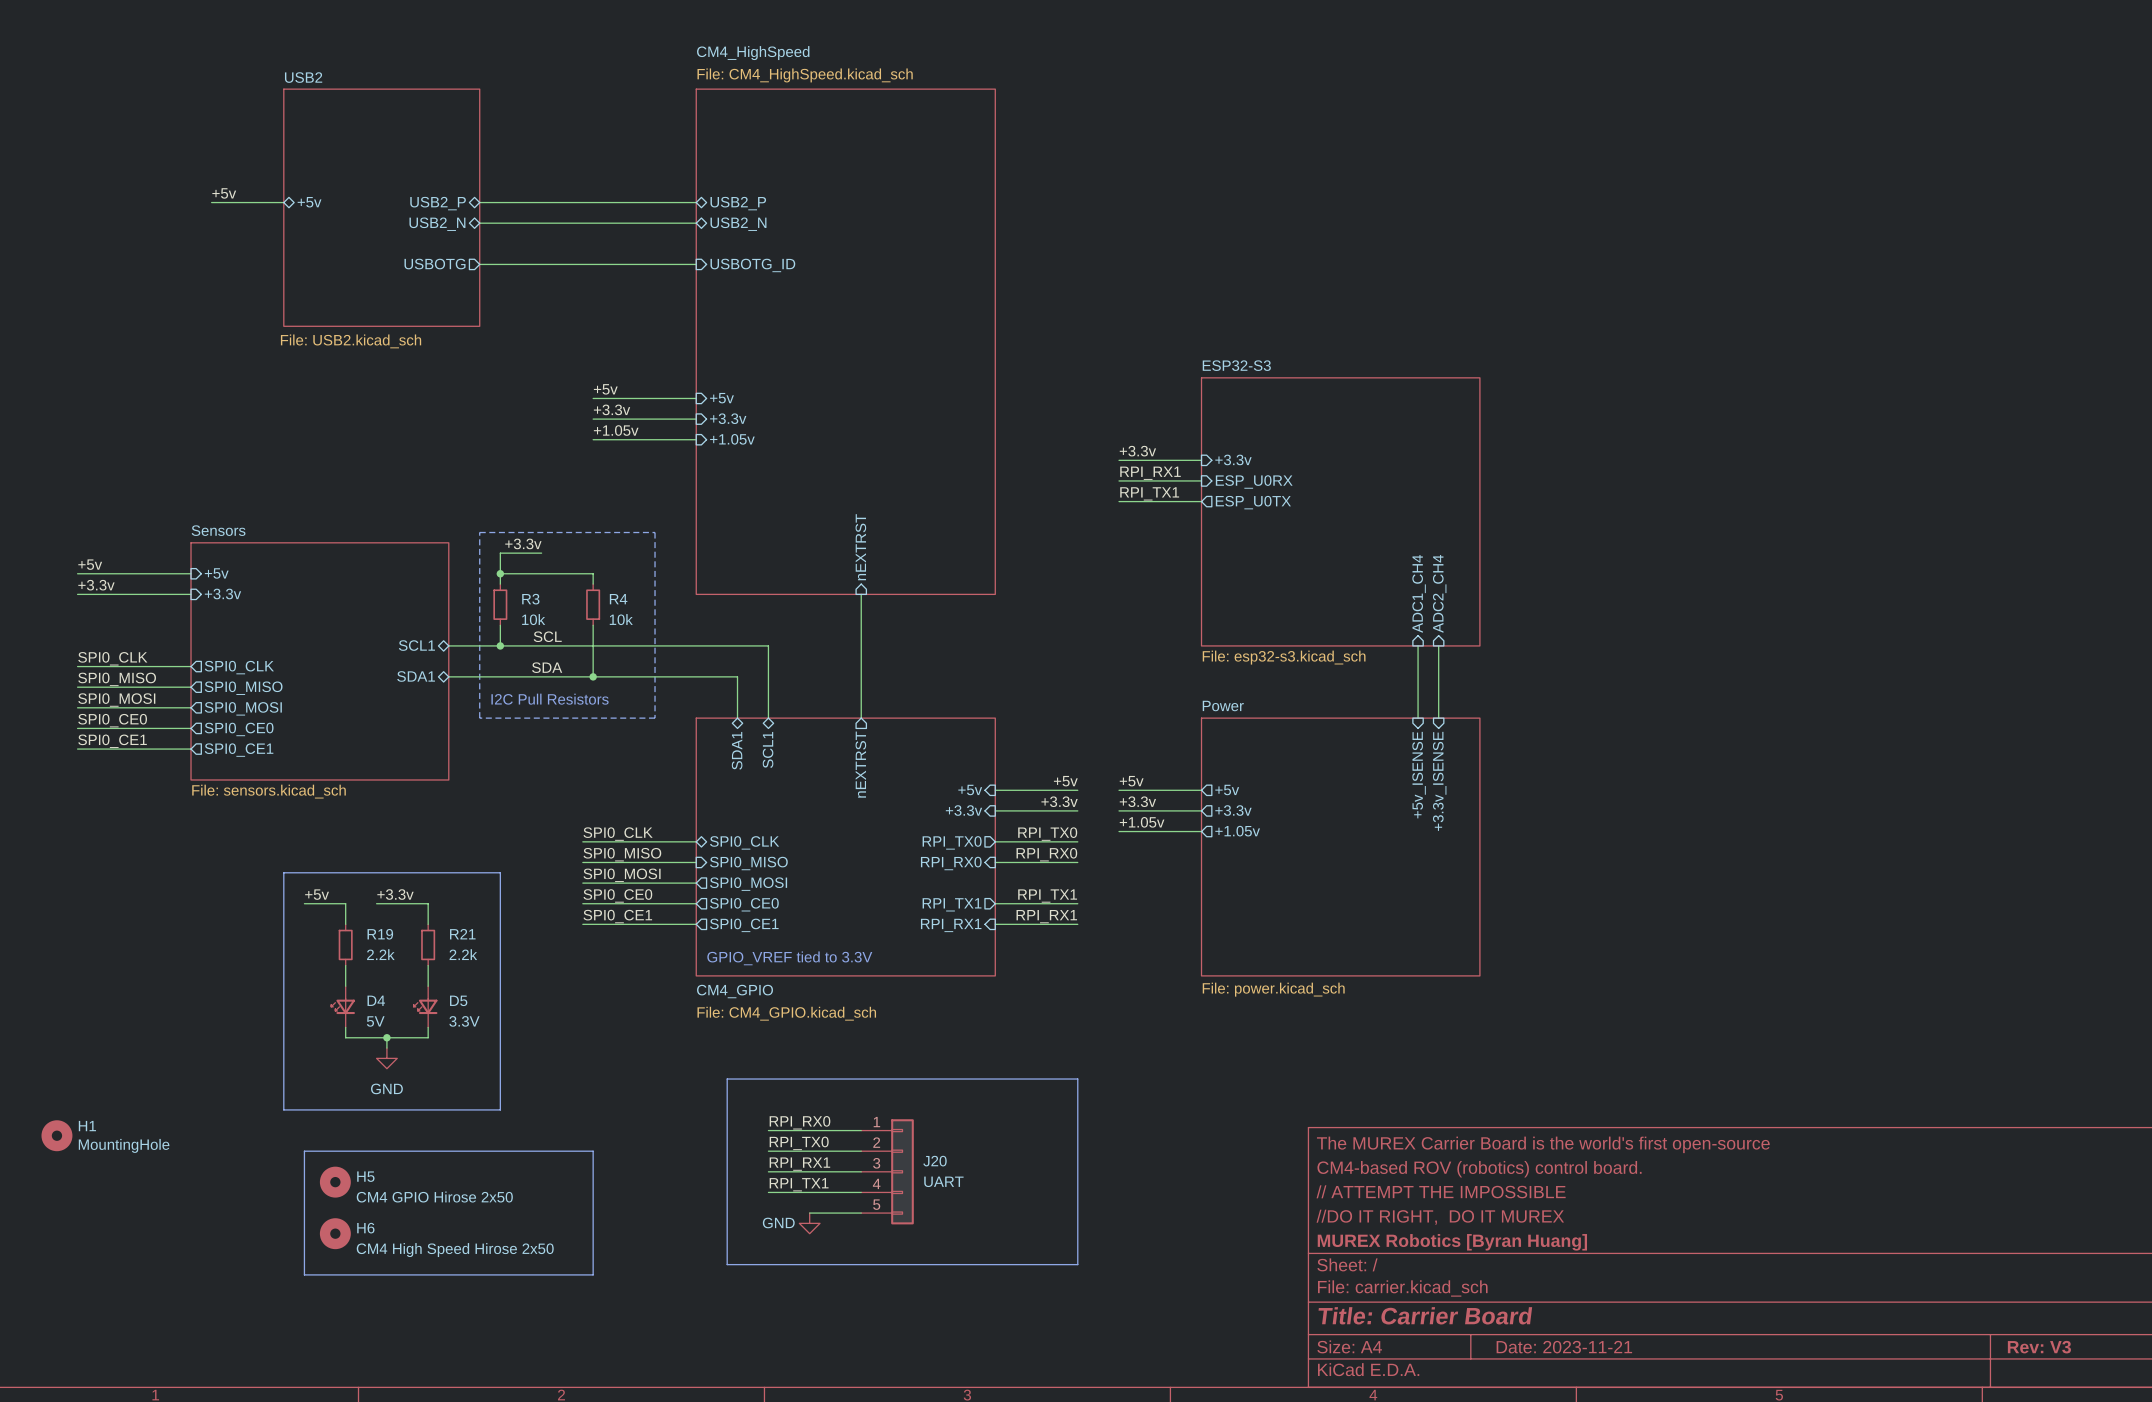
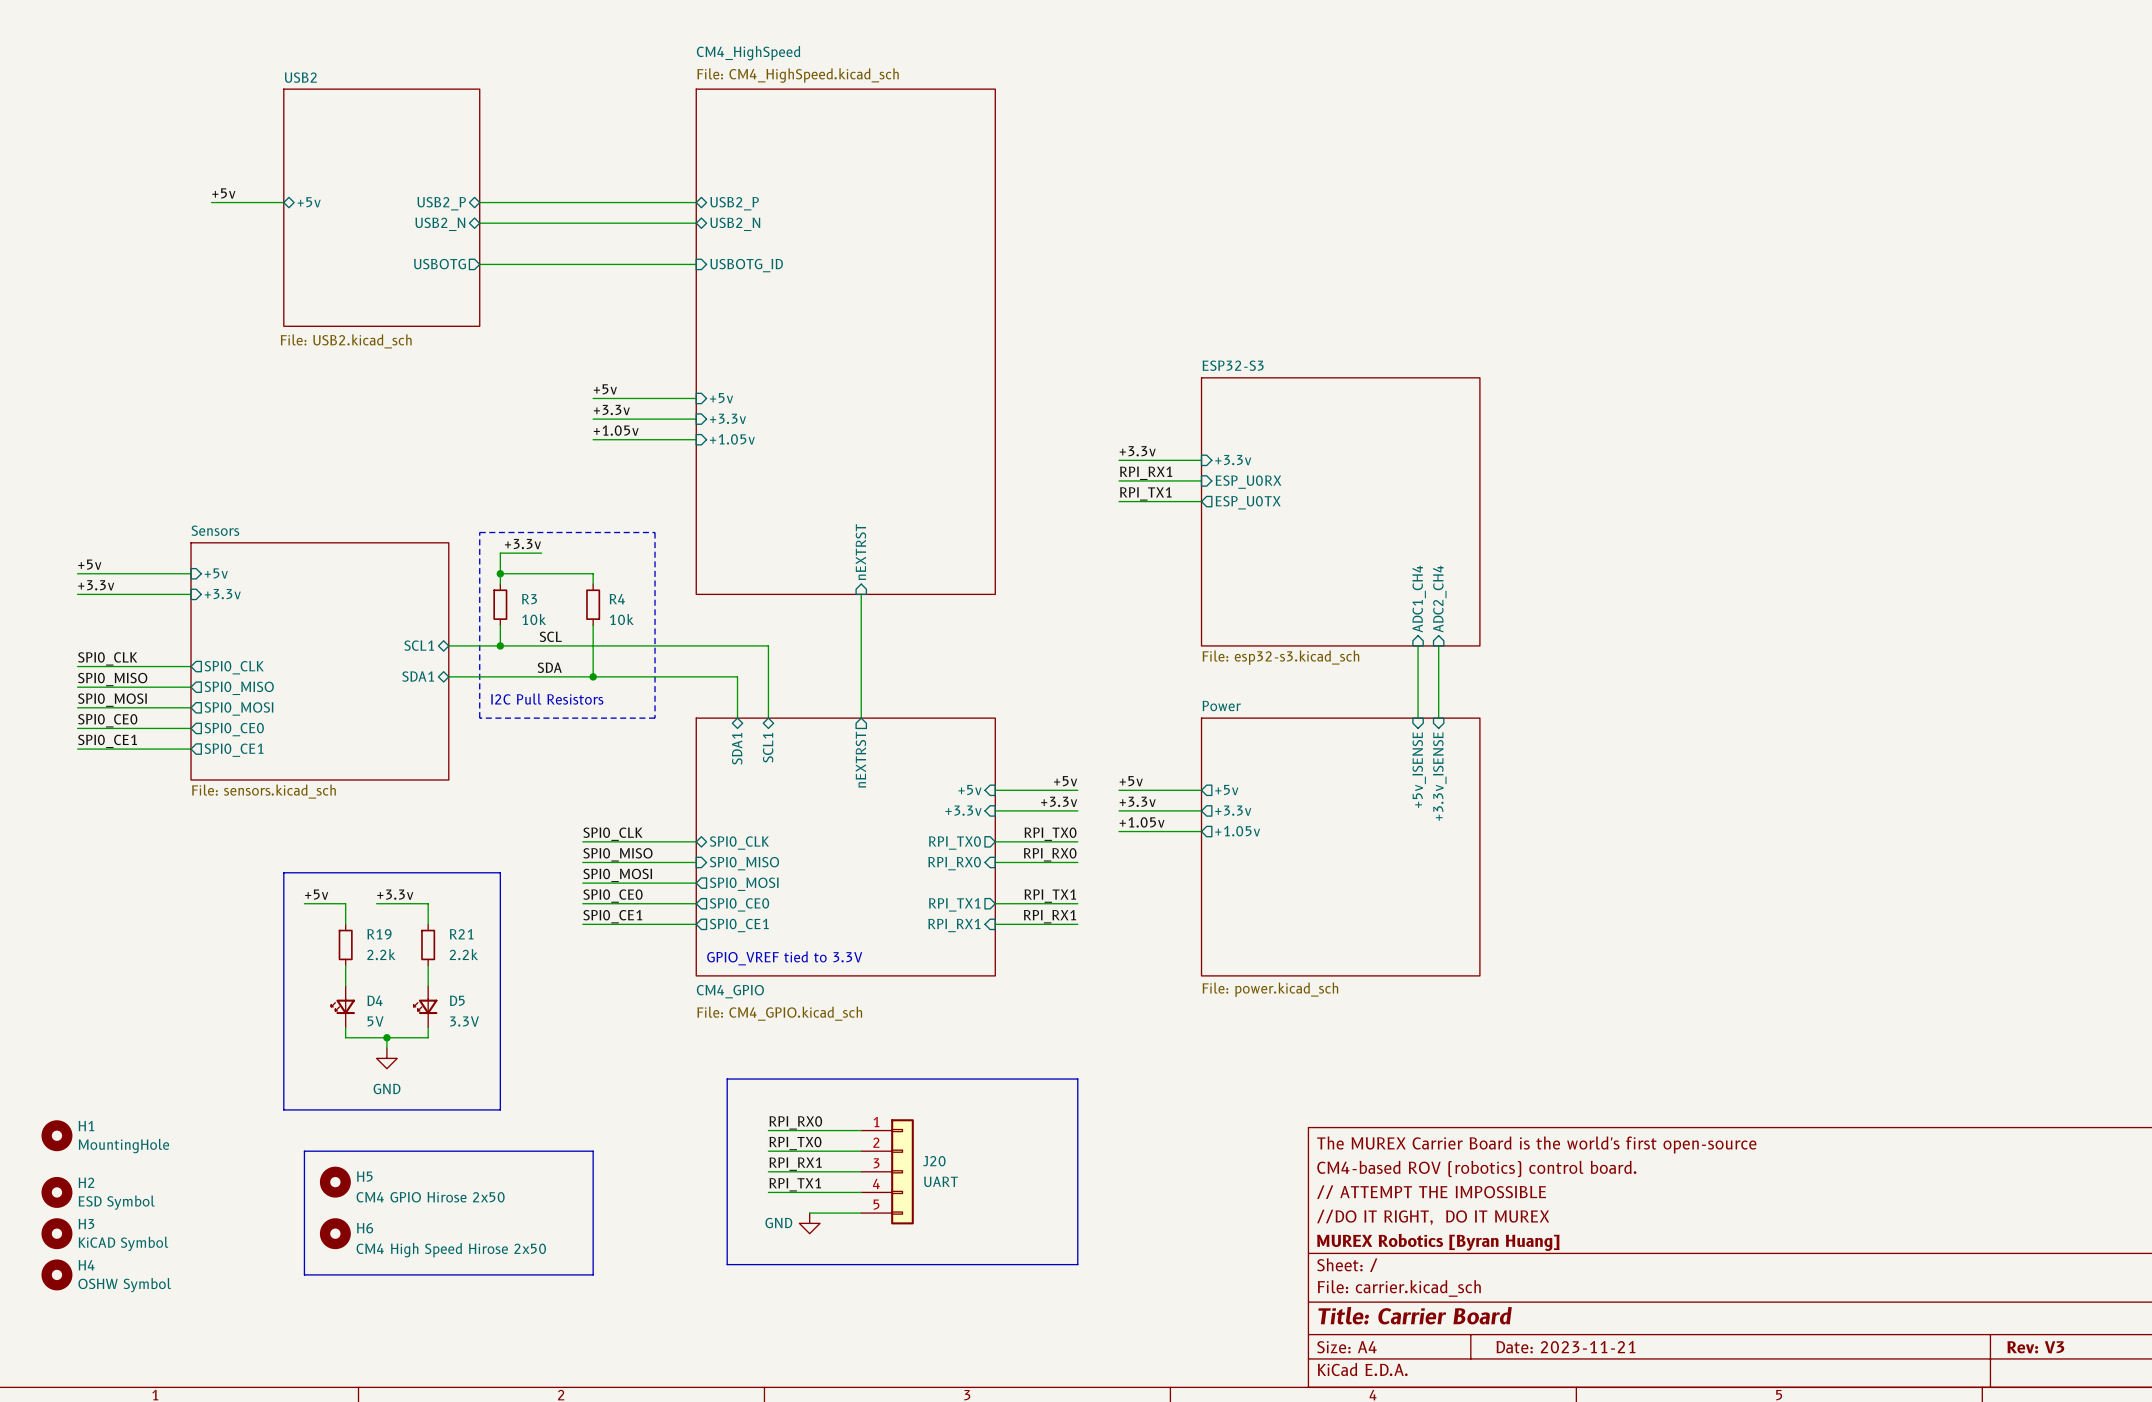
H2: none -> ESD Symbol (56, 1192)
H3: none -> KiCAD Symbol (56, 1233)
H4: none -> OSHW Symbol (56, 1274)

